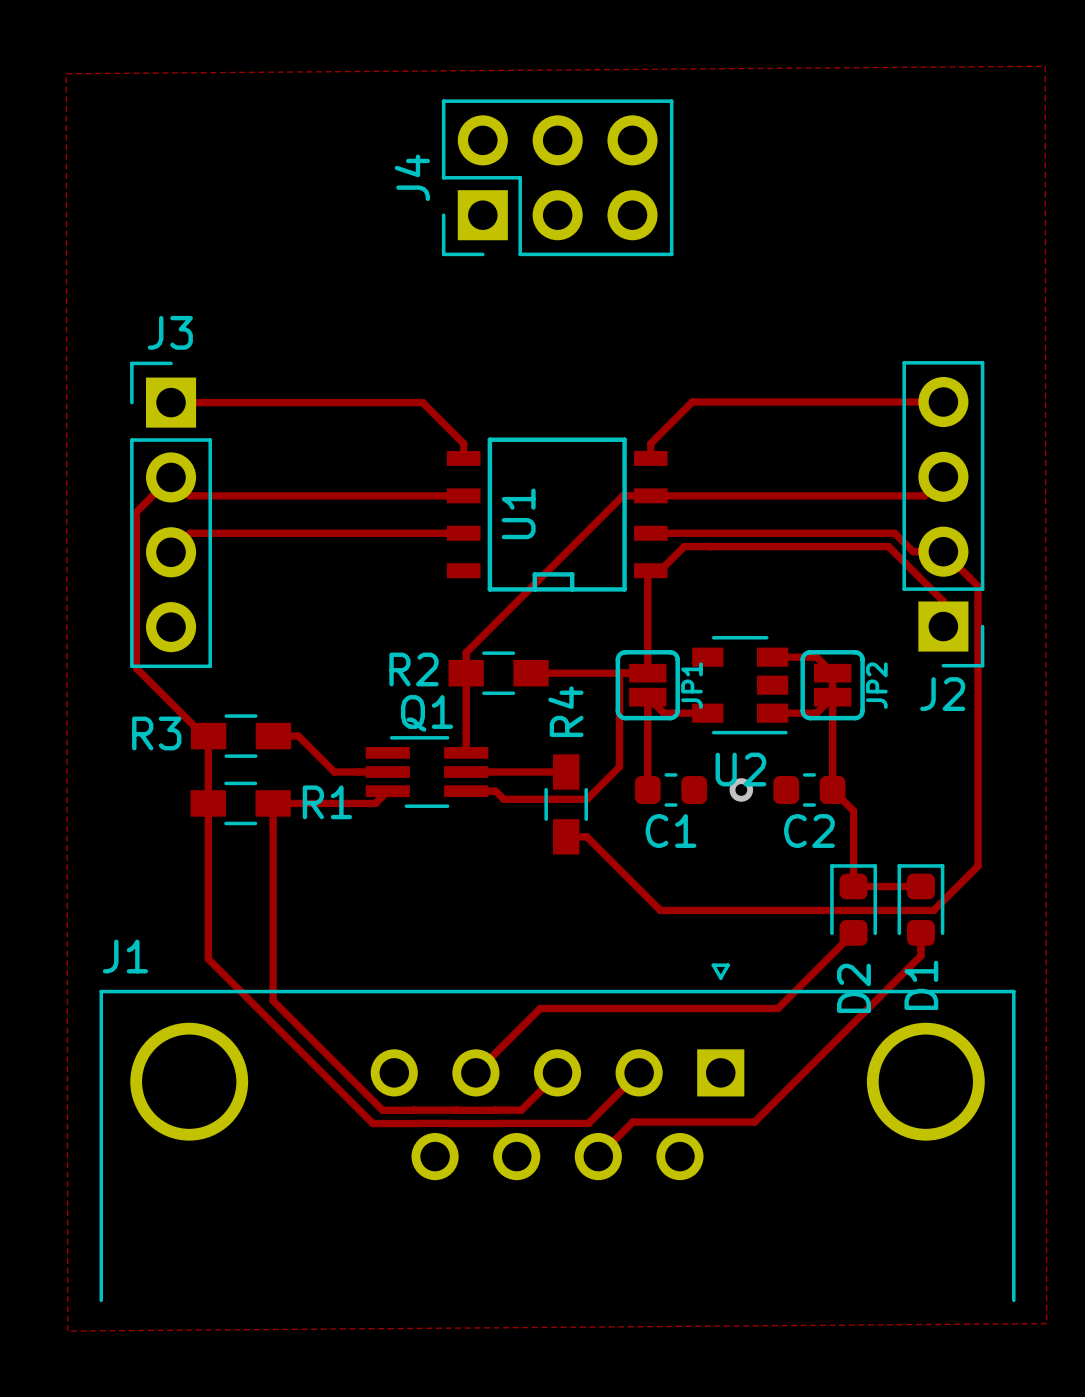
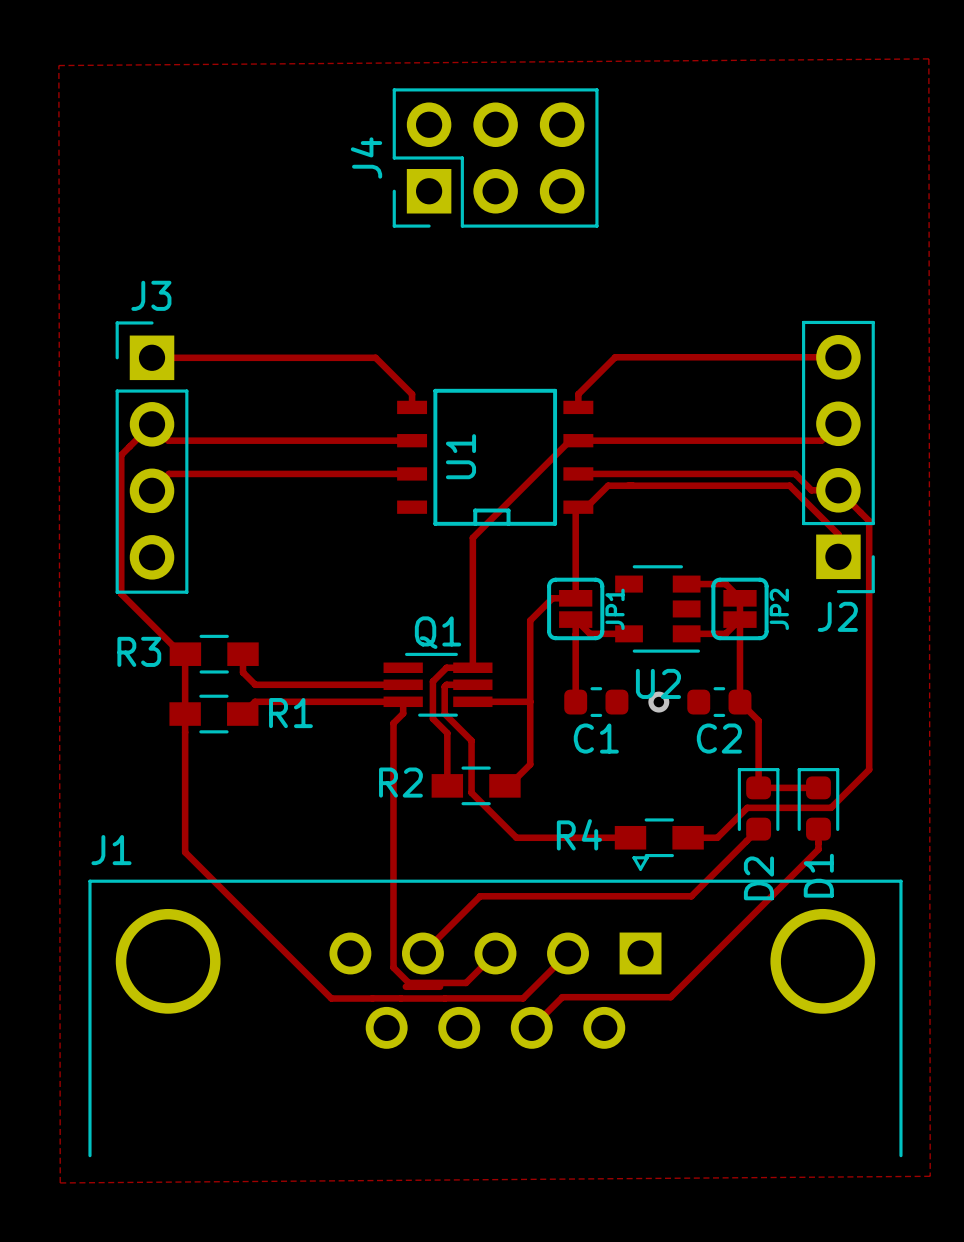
track: (641, 495) (622, 495) (466, 652) (466, 752) -> (570, 440) (472, 537) (472, 667) (446, 667) (432, 681) (432, 718) (447, 733) (447, 785)
R2 position: (498, 673) -> (476, 785)
track: (531, 673) (621, 673) -> none
track: (619, 675) (619, 766) (587, 799) (503, 799) (495, 791) (466, 791) -> (550, 600) (530, 620) (530, 764) (508, 785) (504, 785)
R4 name position: R4 (565, 711) -> R4 (579, 834)
track: (273, 736) (298, 736) (334, 772) (387, 772) -> (243, 654) (243, 672) (255, 684) (403, 684)
track: none -> (472, 684) (446, 684) (444, 686) (444, 713) (471, 740) (471, 792) (516, 837) (630, 837)
Q1 position: (427, 772) -> (438, 684)
track: (466, 772) (566, 772) -> none
track: none -> (472, 701) (530, 701)
track: (387, 791) (375, 803) (273, 803) (273, 1000) (382, 1110) (413, 1110) -> none
R4 rotation: 0° (566, 804) -> 90° clockwise (659, 837)
R4 position: (566, 804) -> (659, 837)
track: (566, 836) (586, 836) (660, 910) (935, 908) -> (688, 837) (717, 837) (747, 807) (831, 807)
track: (557, 1072) (521, 1110) (495, 1110) -> (495, 953) (466, 982) (408, 982) (393, 967) (393, 723) (403, 713) (403, 701) (254, 701) (242, 714)
track: (413, 1110) (456, 1110) -> none

